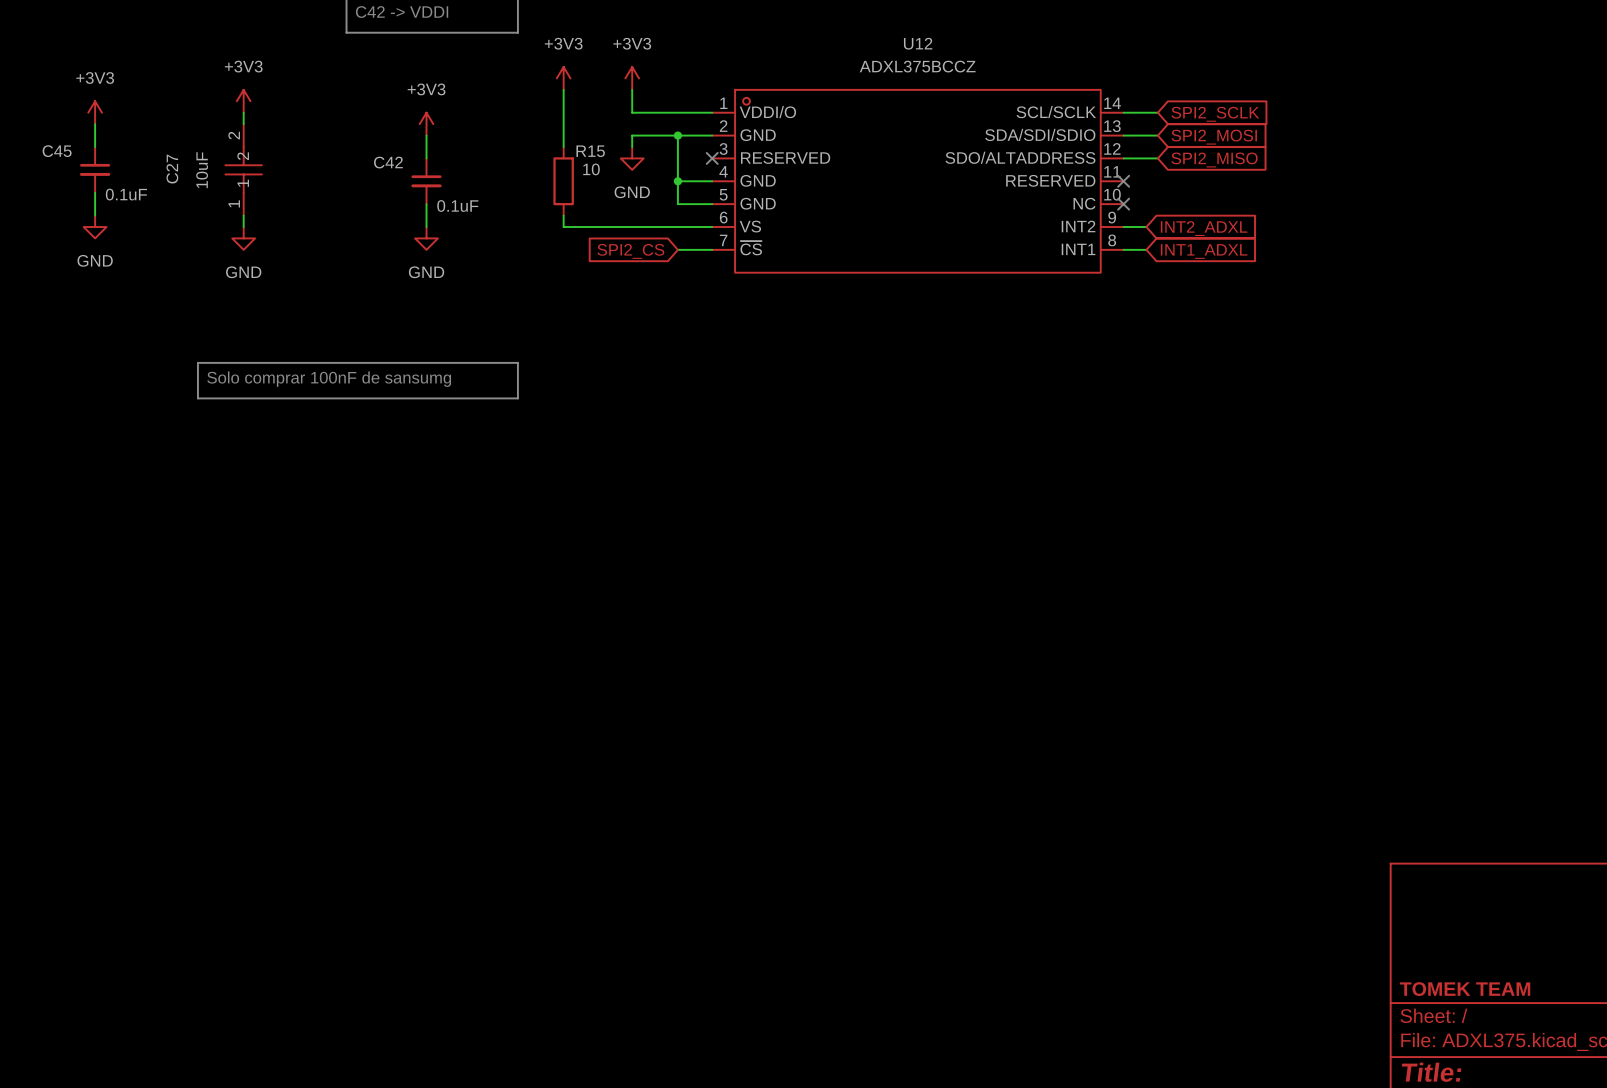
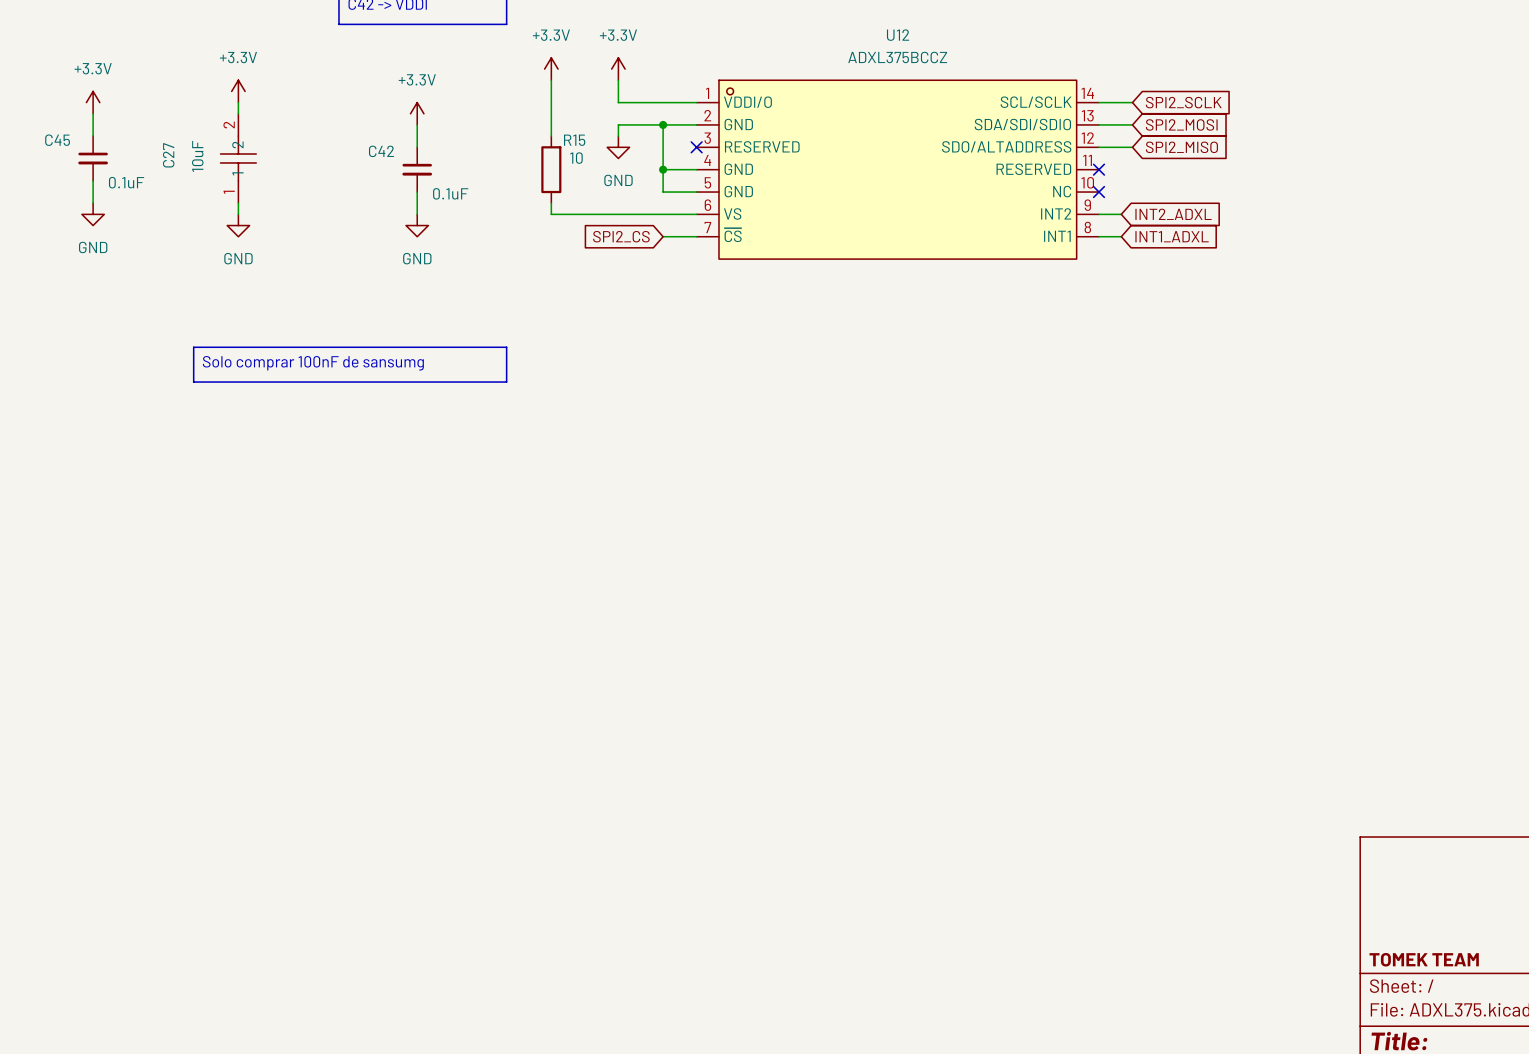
power symbol: +3V3 (563, 78) -> +3.3V (551, 69)
power symbol: +3V3 (632, 78) -> +3.3V (618, 69)
power symbol: +3V3 (243, 101) -> +3.3V (238, 91)
power symbol: +3V3 (95, 112) -> +3.3V (93, 102)
power symbol: +3V3 (426, 124) -> +3.3V (417, 113)

